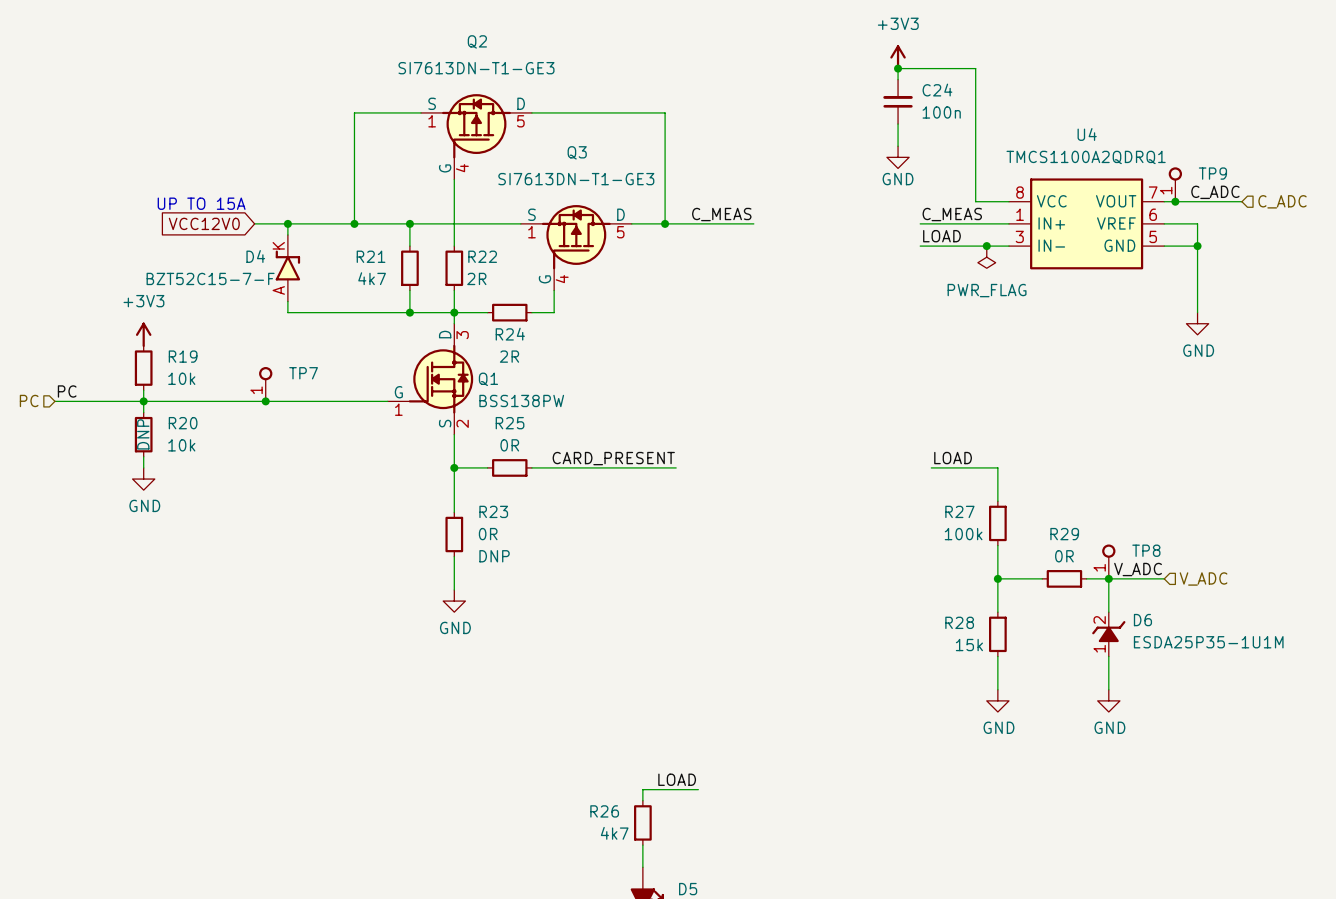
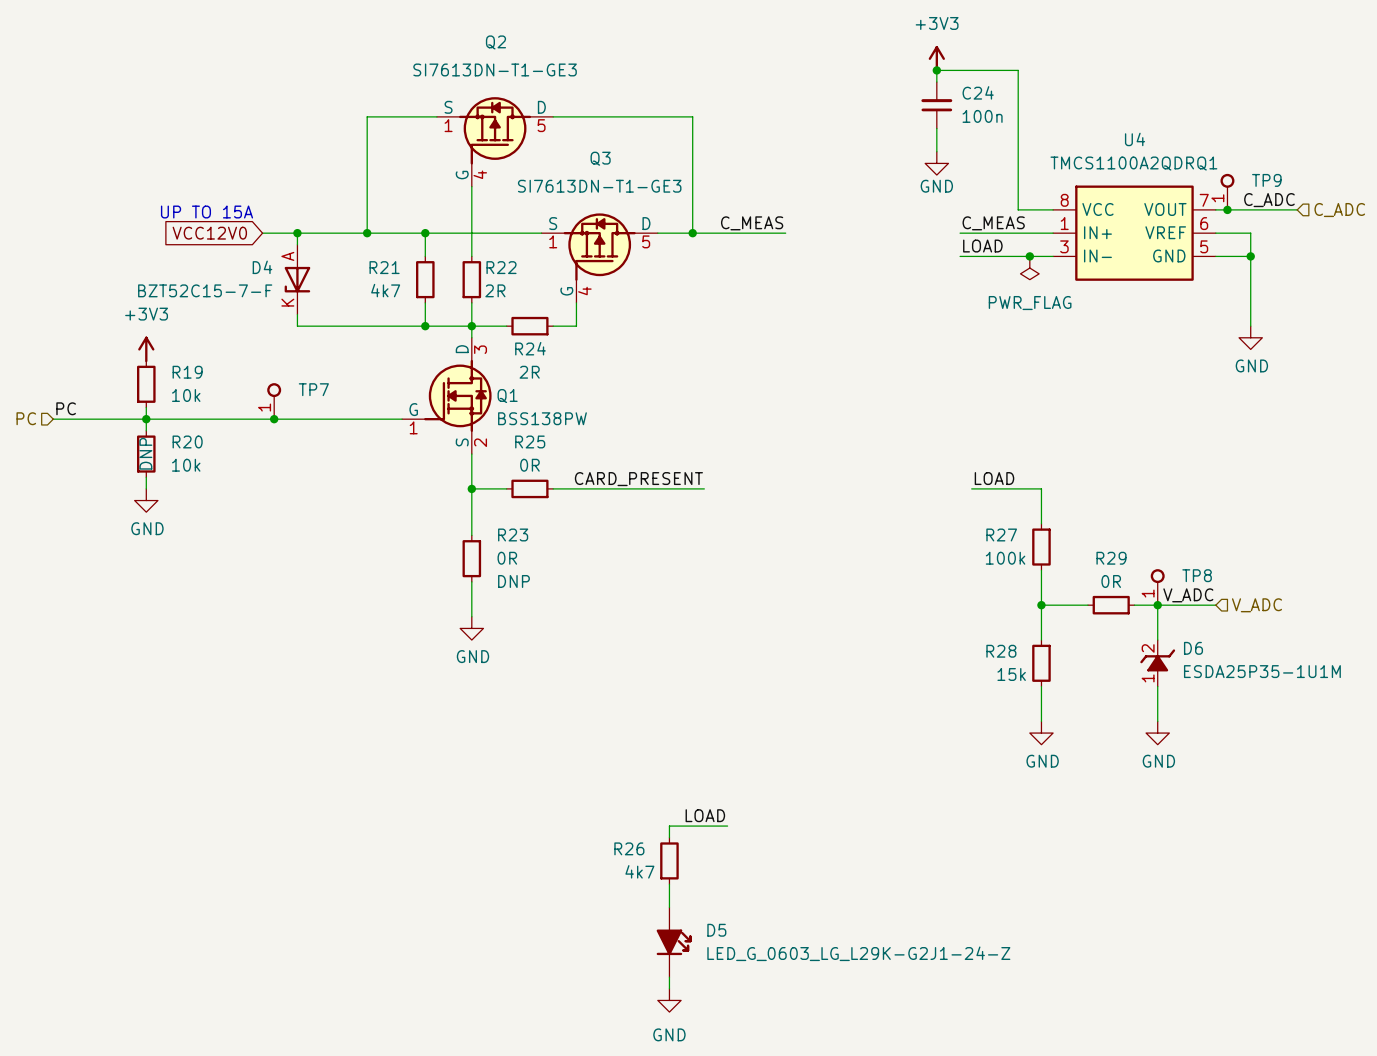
D4 symbol: [275, 234, 301, 302] -> [284, 244, 311, 315]
D4 text position: BZT52C15-7-F (210, 278) -> BZT52C15-7-F (205, 290)

